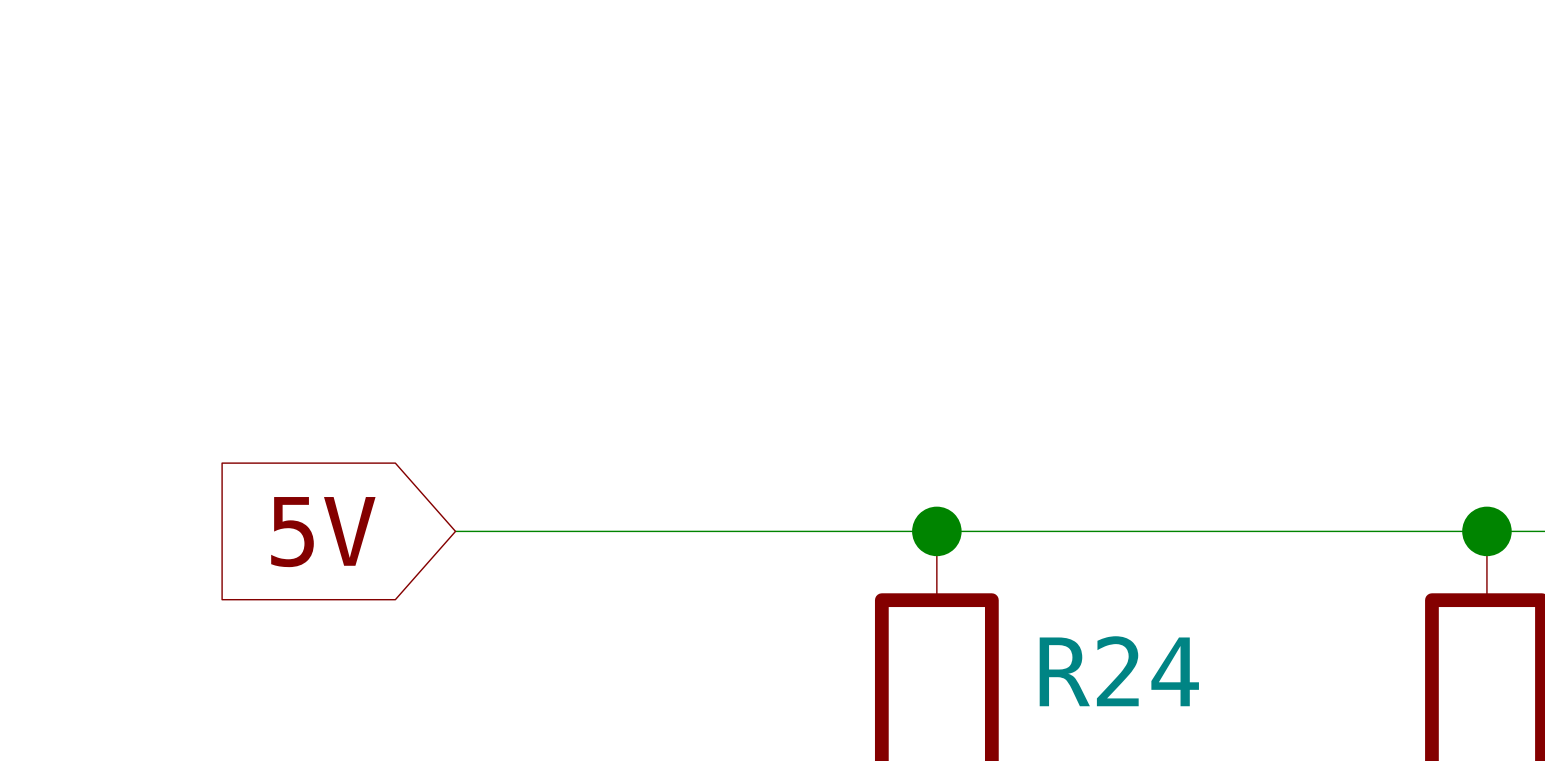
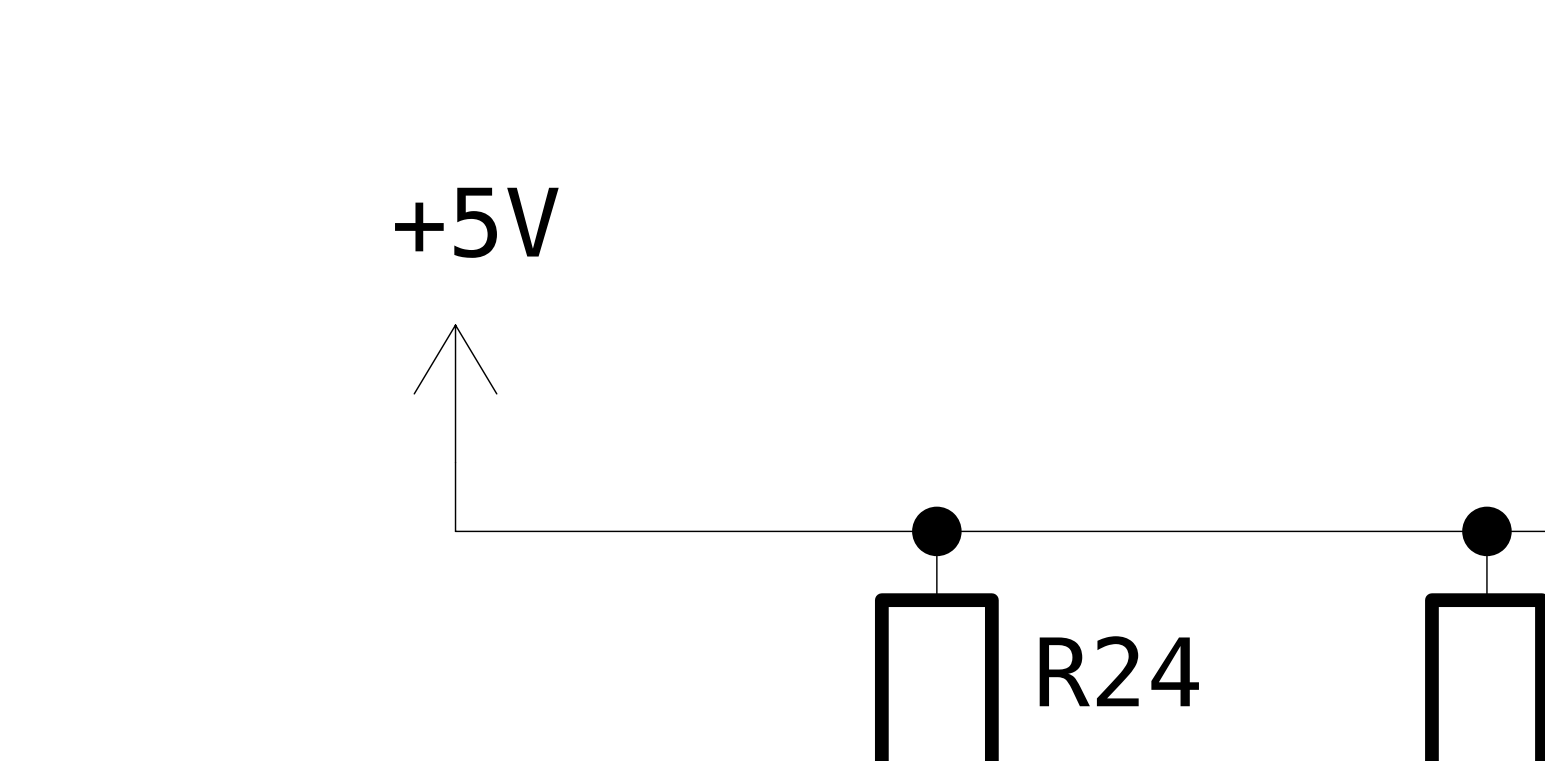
power symbol: none -> +5V (455, 393)
wire: none -> (455, 462) (455, 531)
global label: 5V (323, 532) -> none

